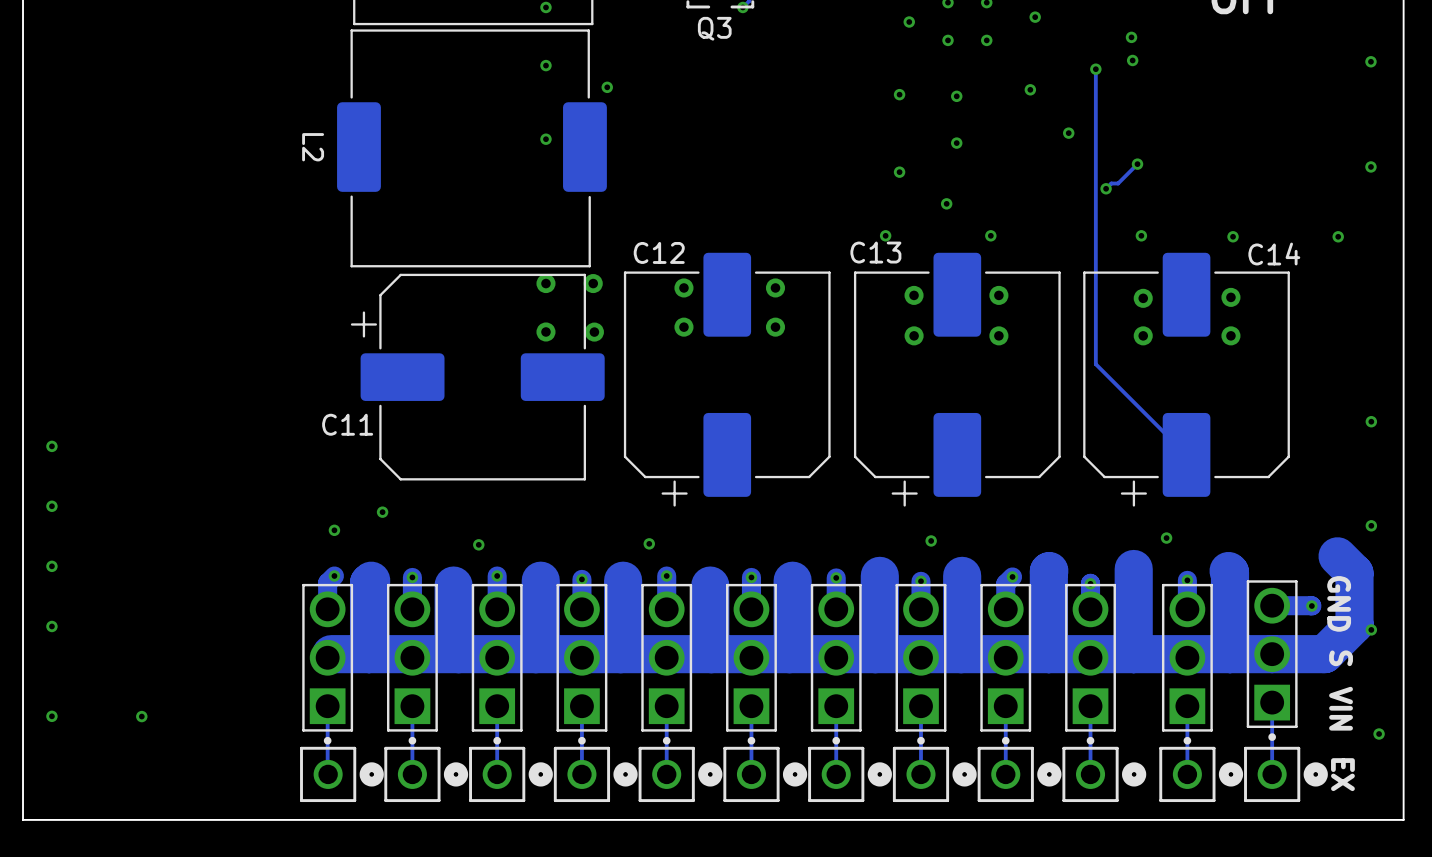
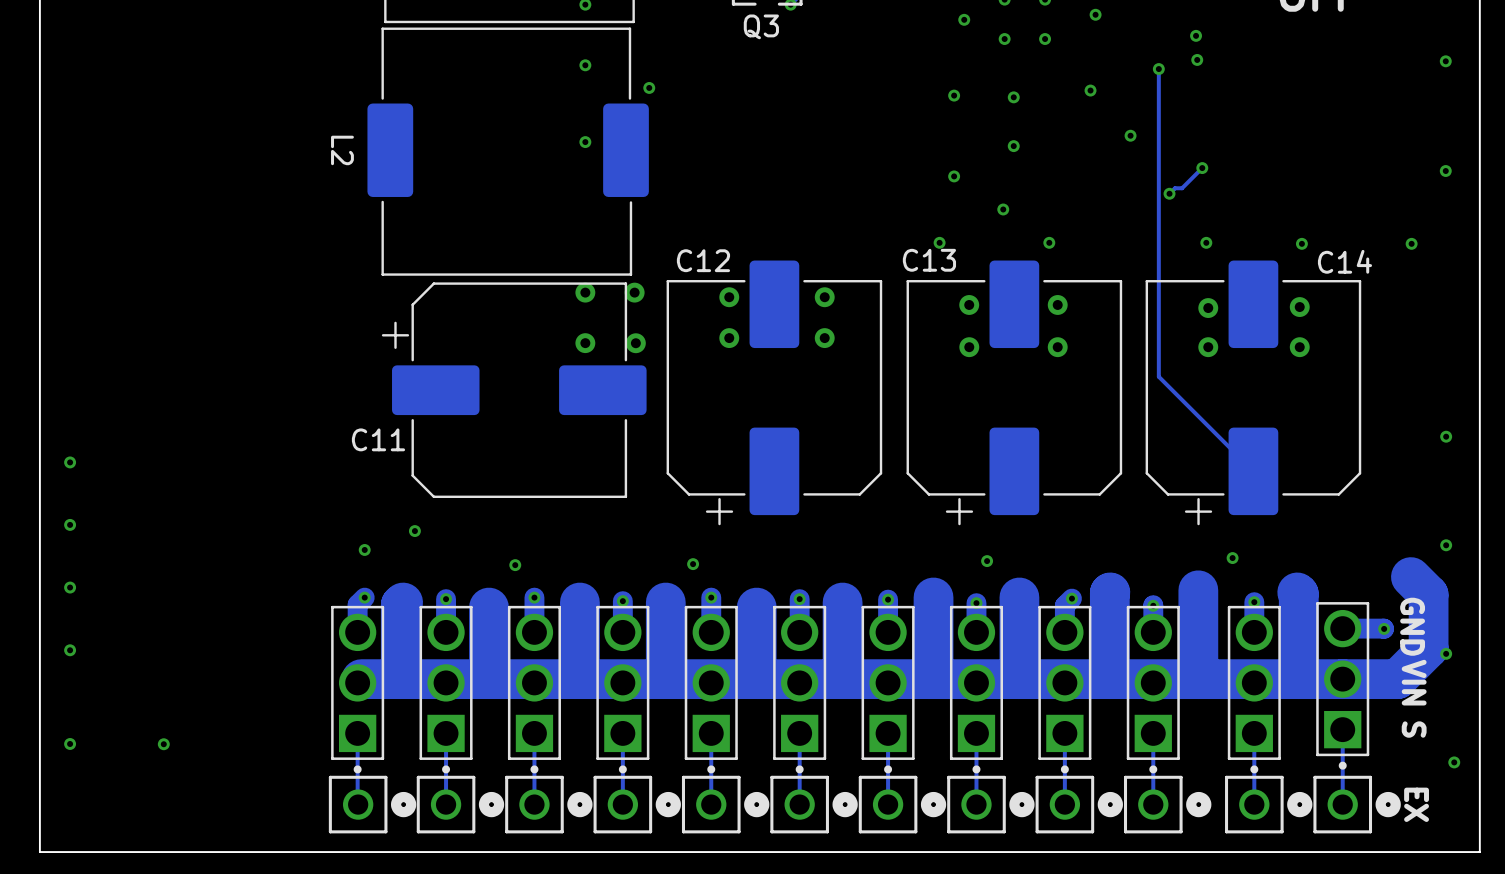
text position: S (1341, 658) -> S (1414, 729)
text position: VIN (1341, 708) -> VIN (1414, 682)

